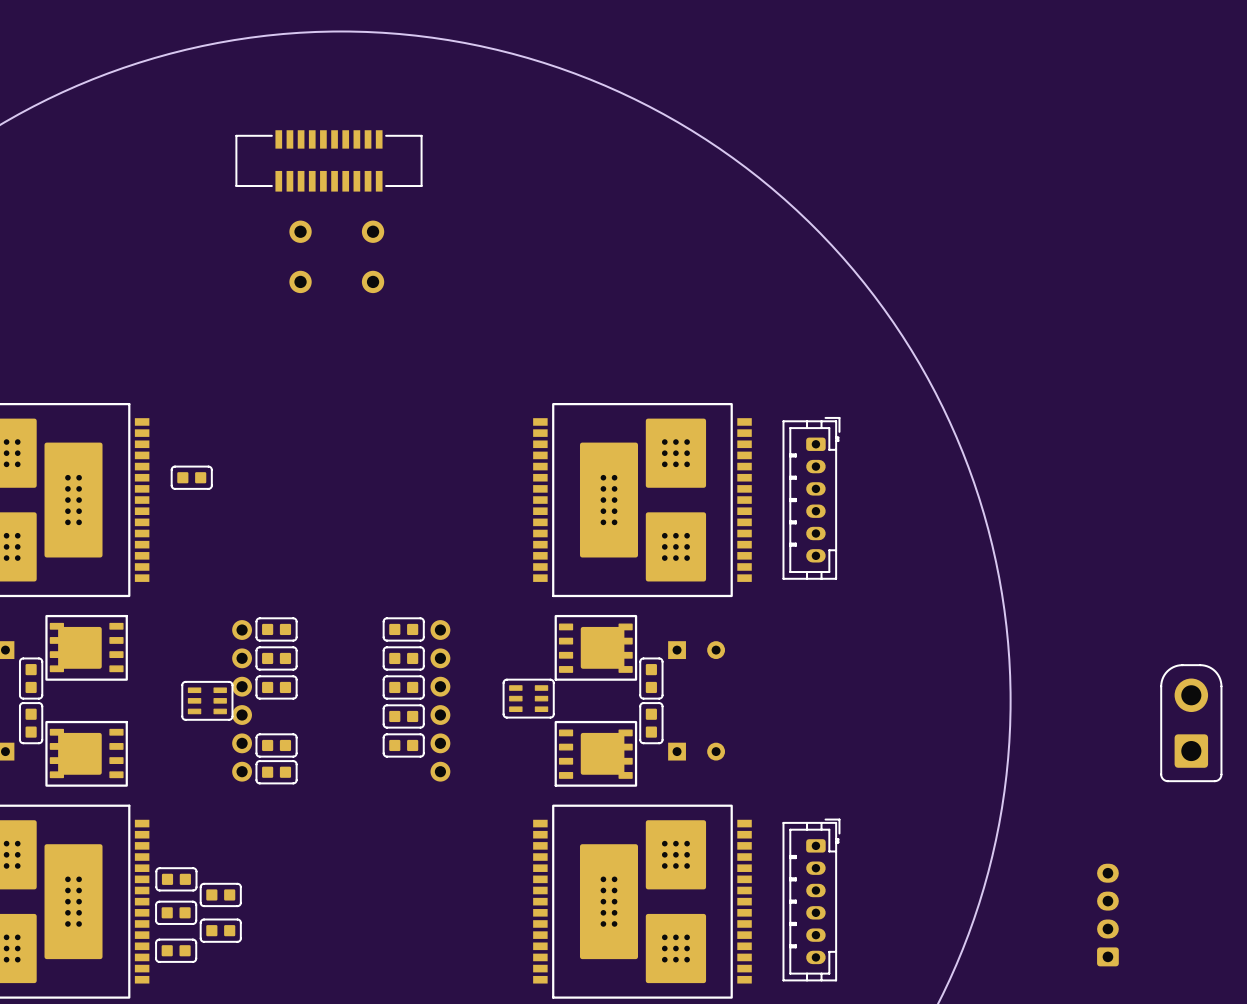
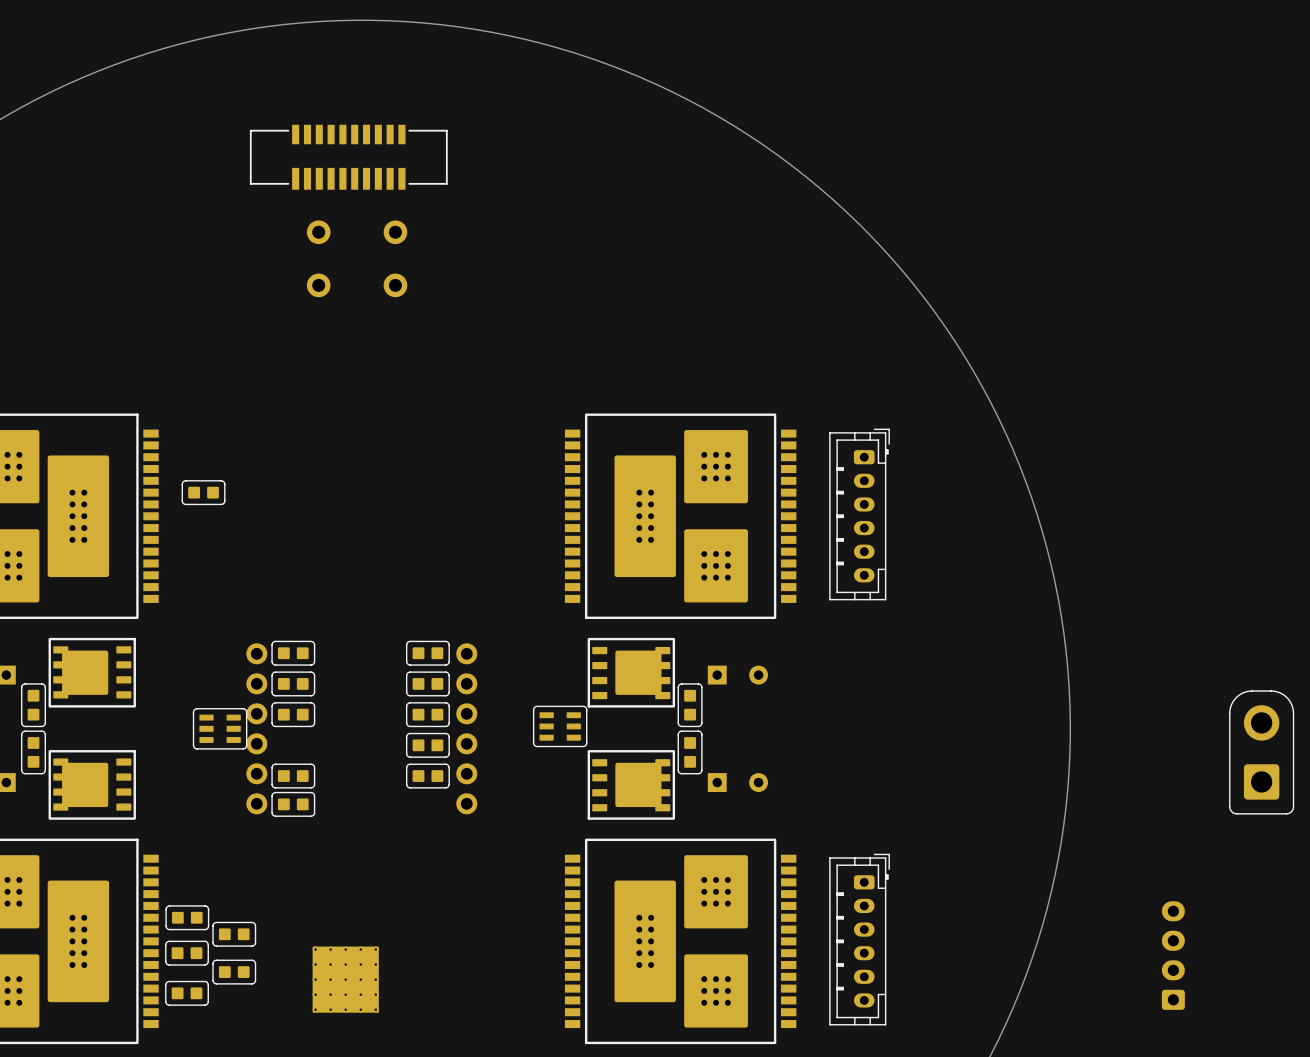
part: none -> (345, 979)

